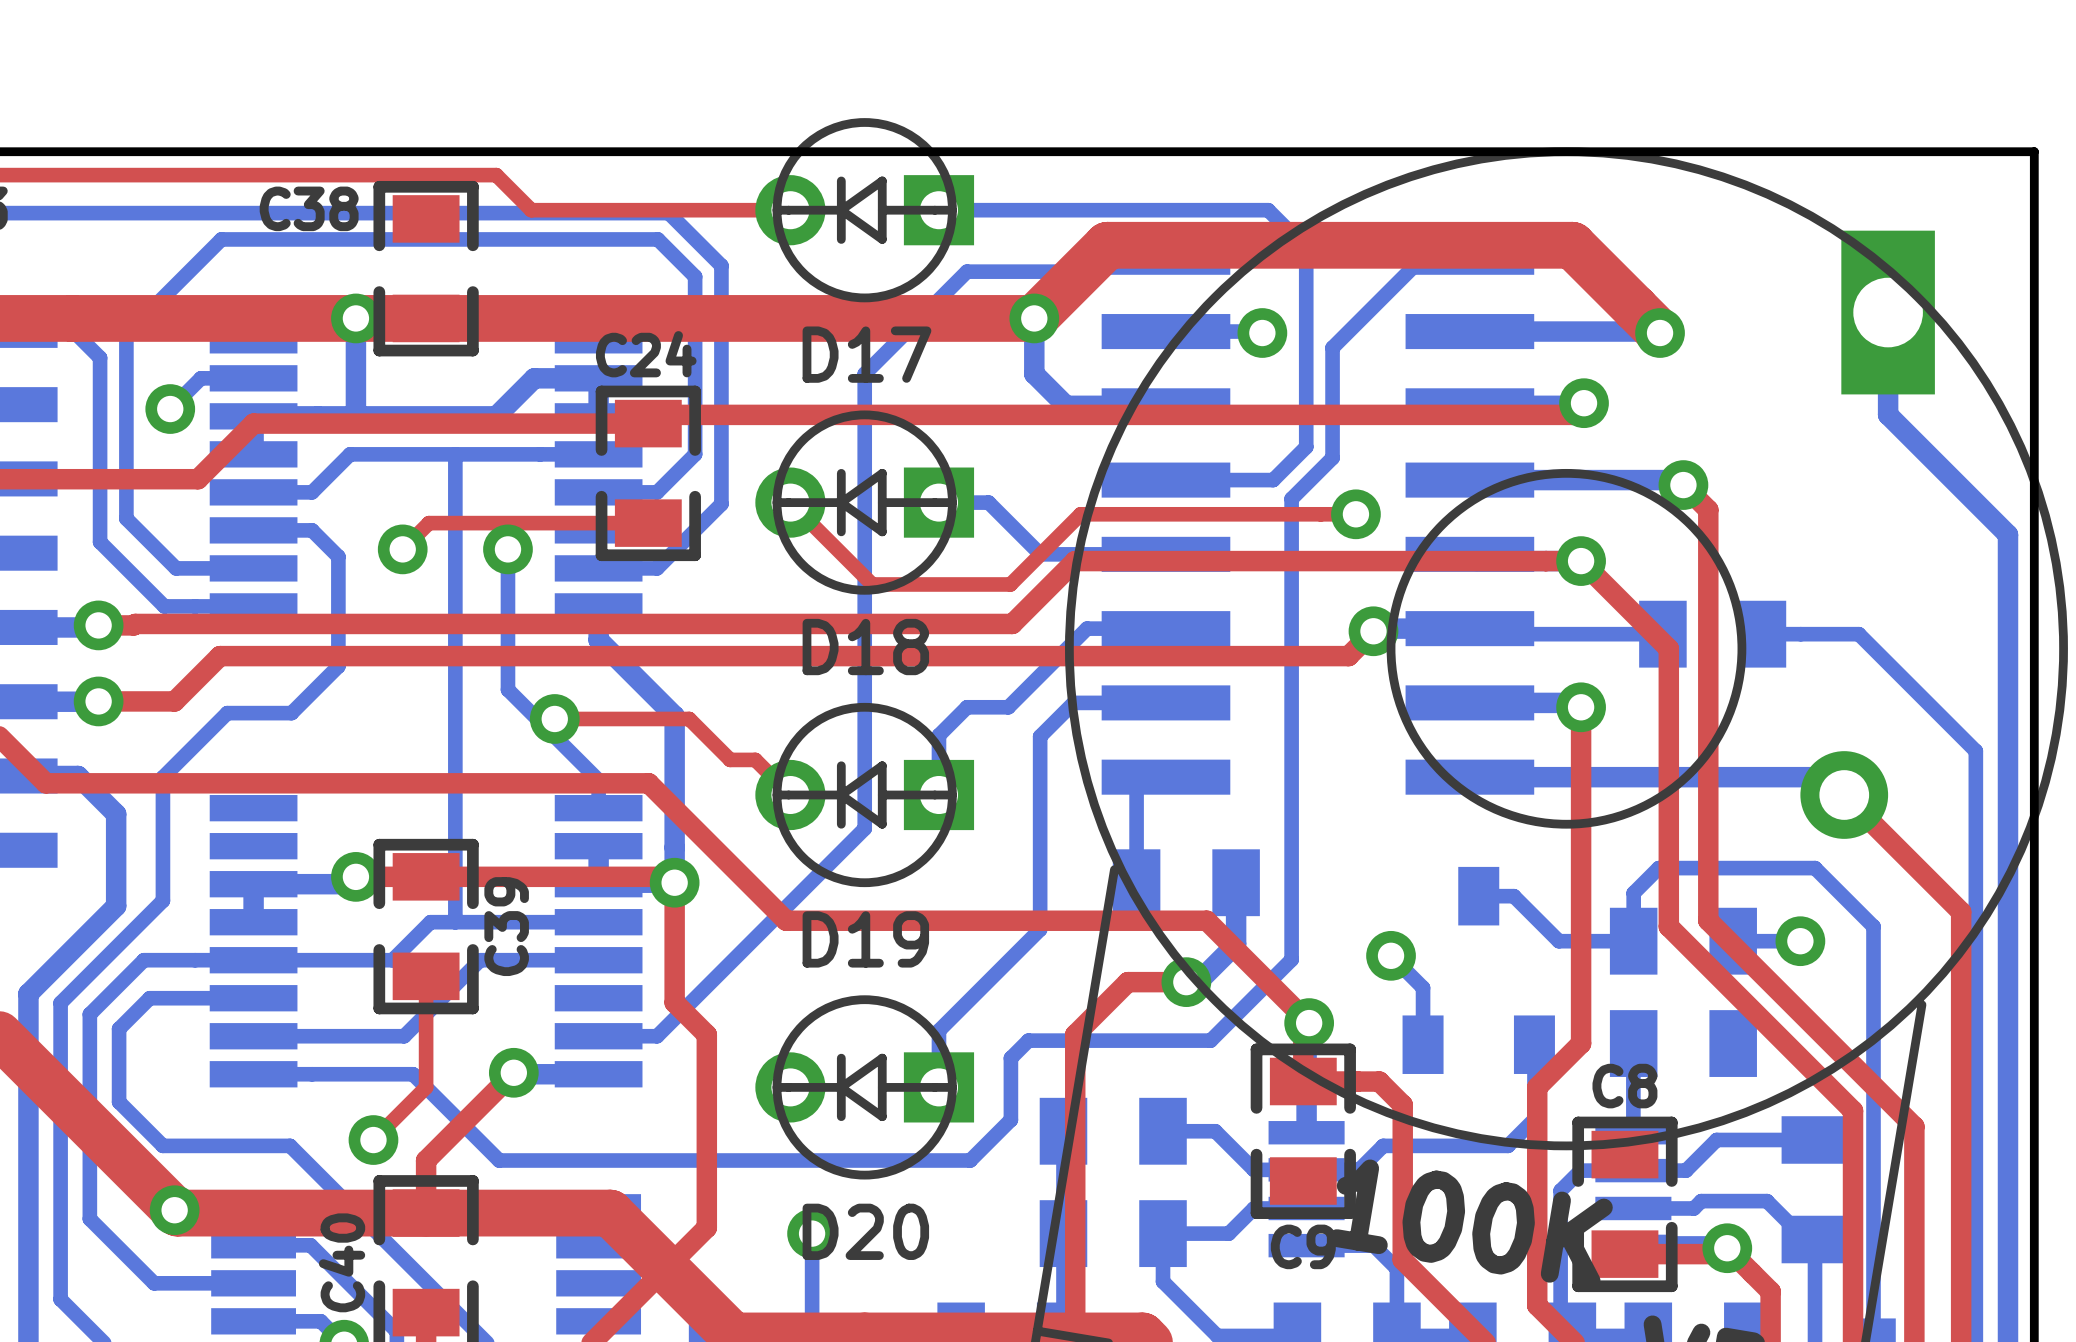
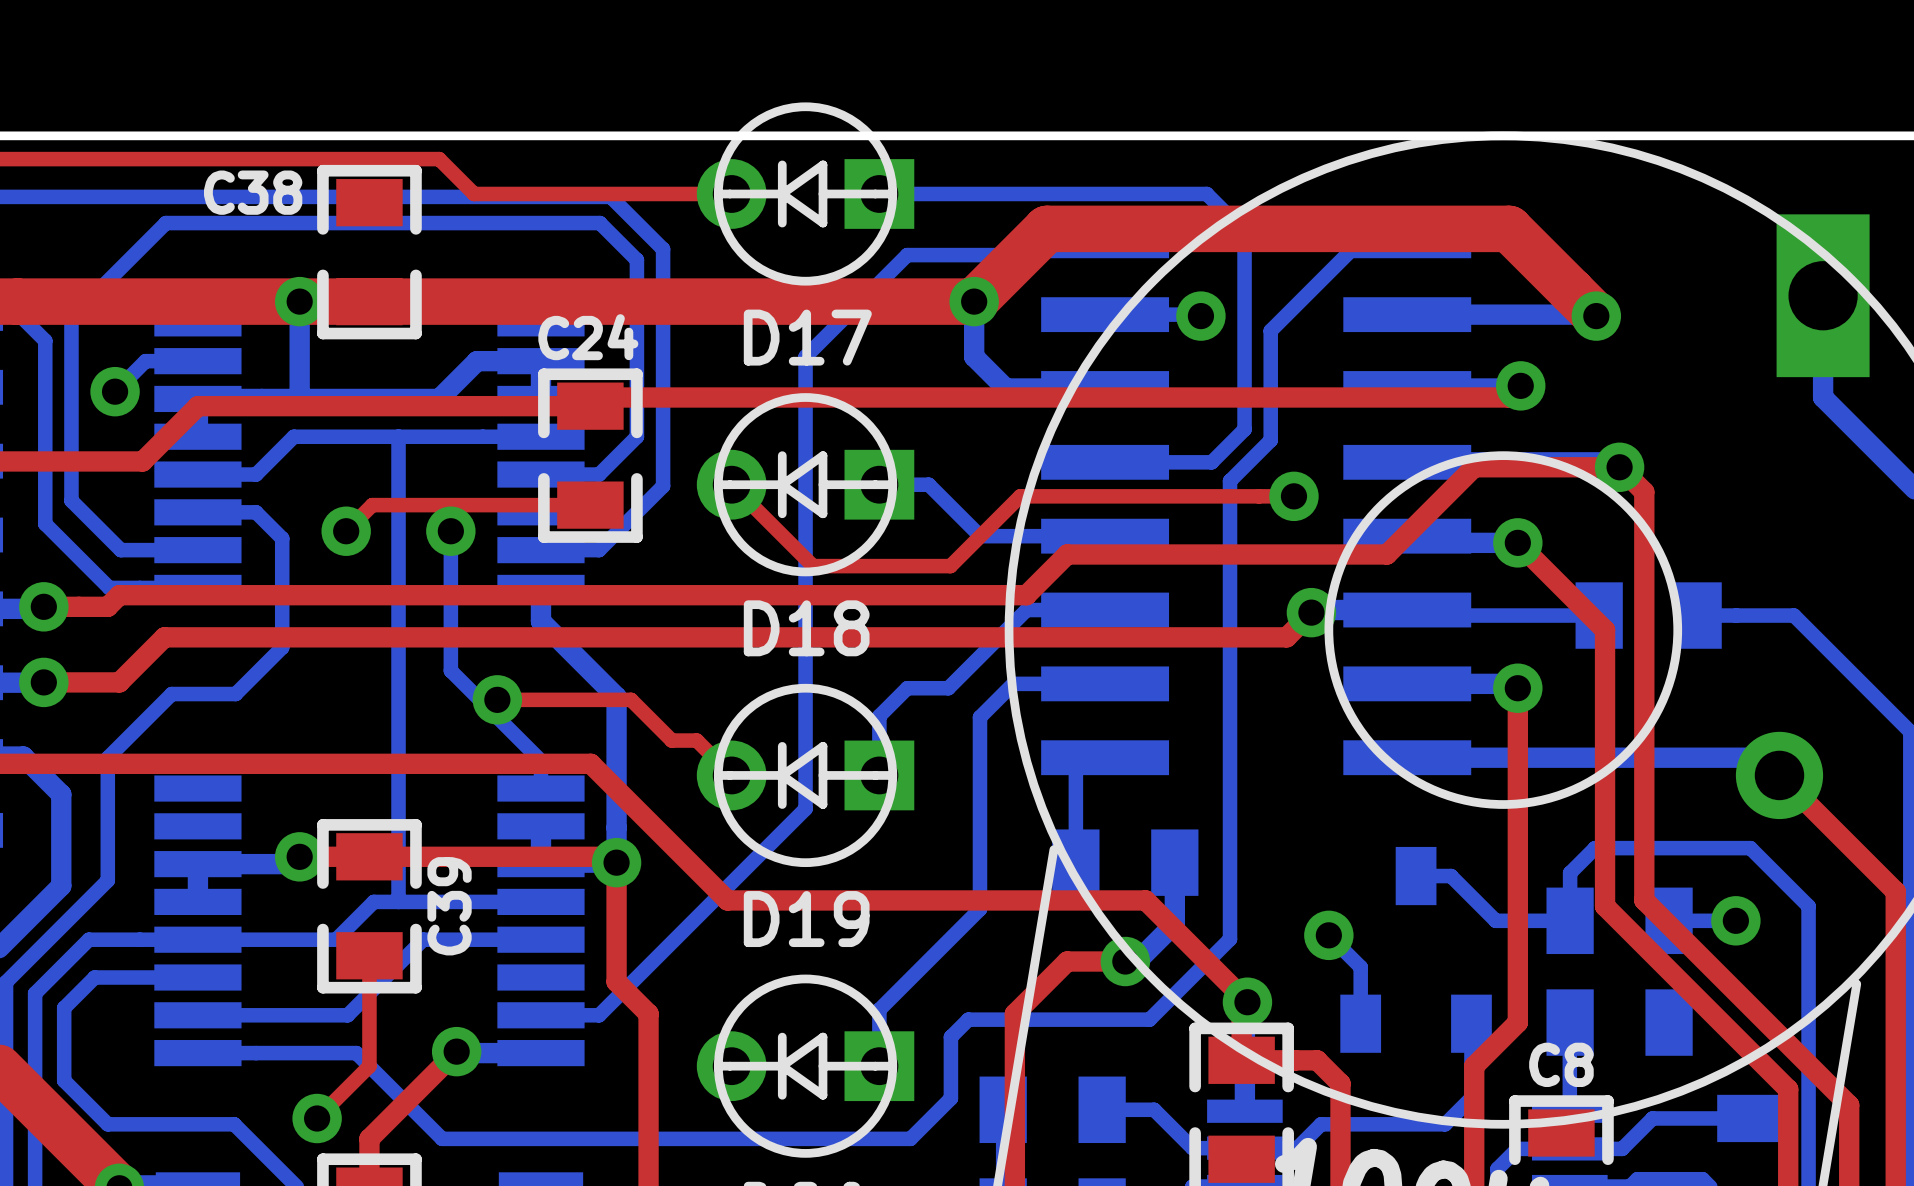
top track: (1581, 561) (1075, 561) (1012, 623) (133, 625) -> (1619, 467) (1474, 467) (1387, 554) (1067, 554) (1026, 595) (119, 595) (107, 606) (78, 606)

